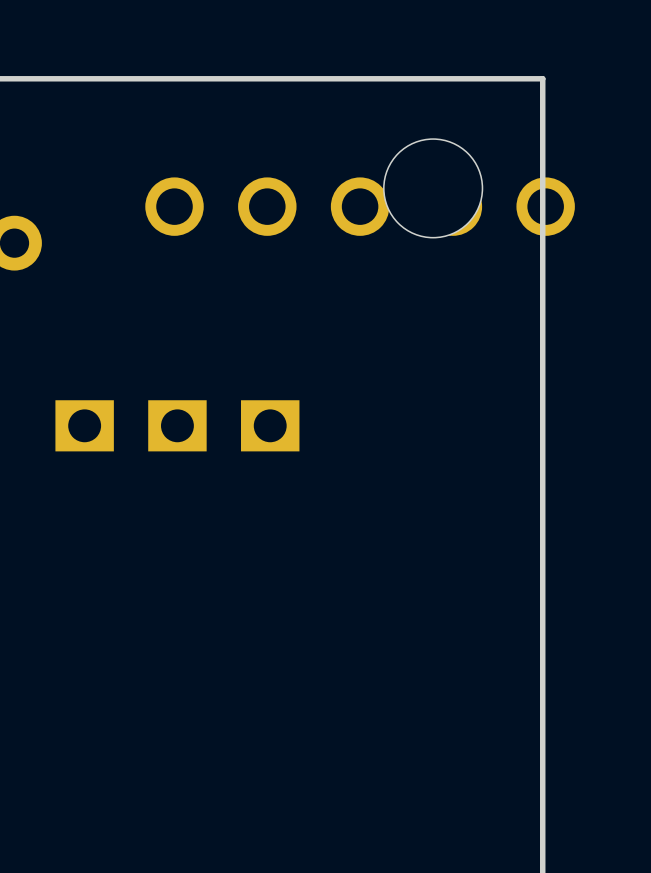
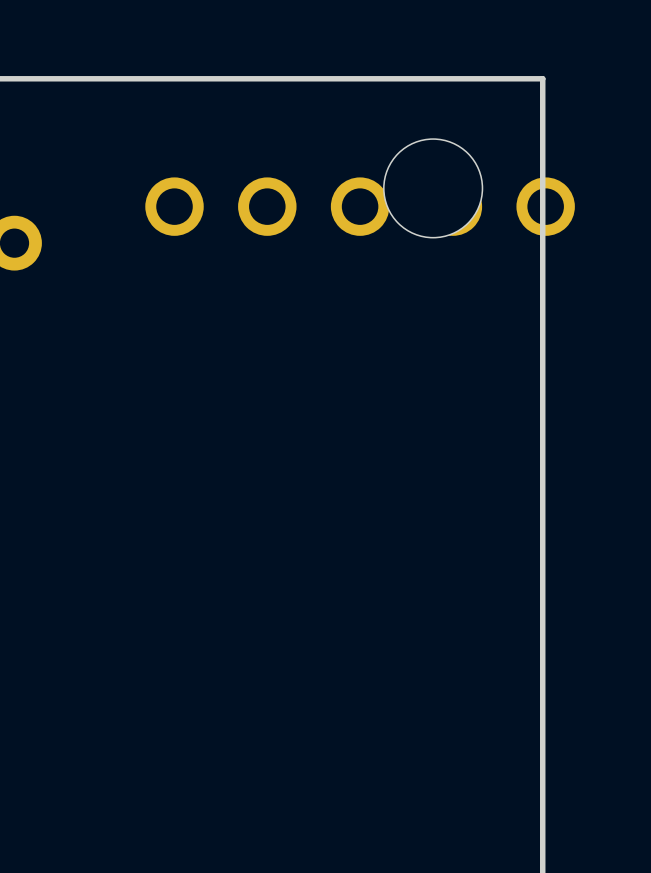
part: (177, 425) -> none

